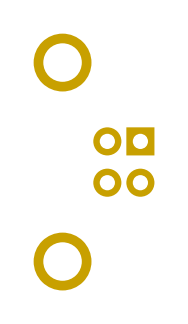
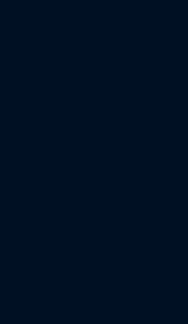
part: (94, 162) -> none

